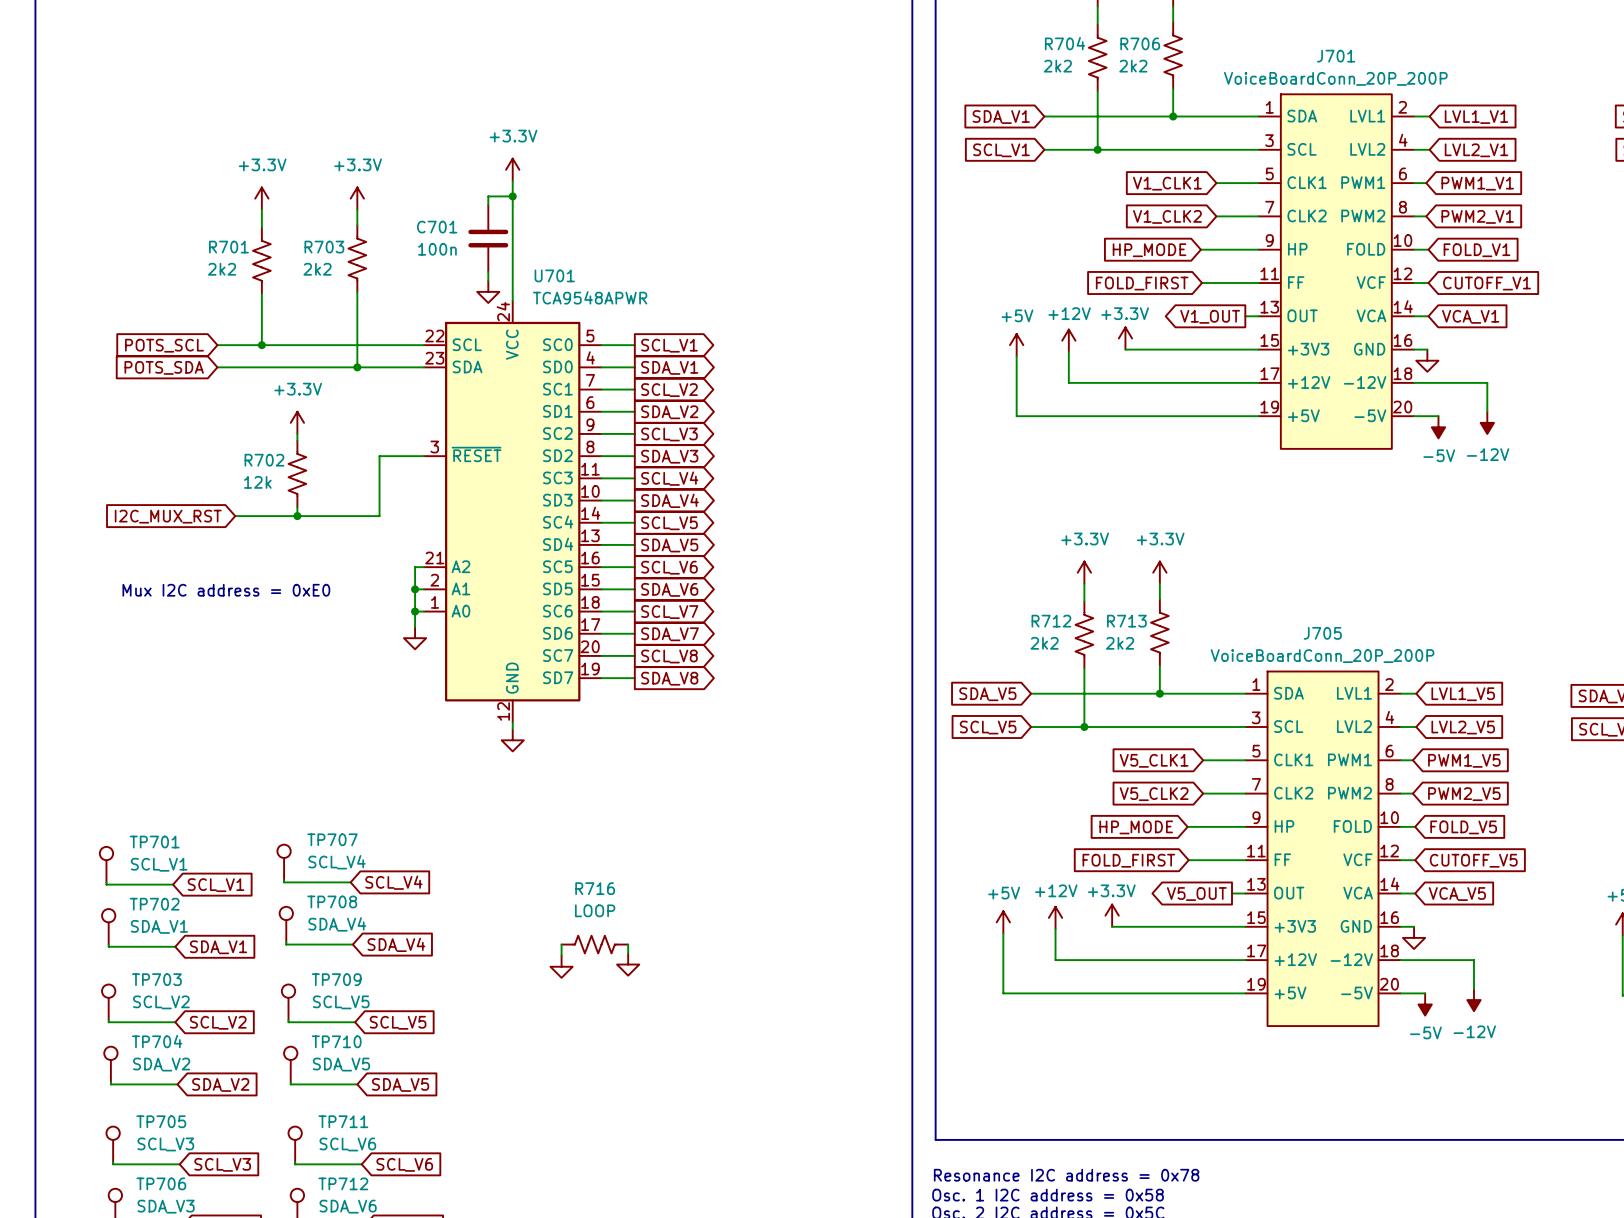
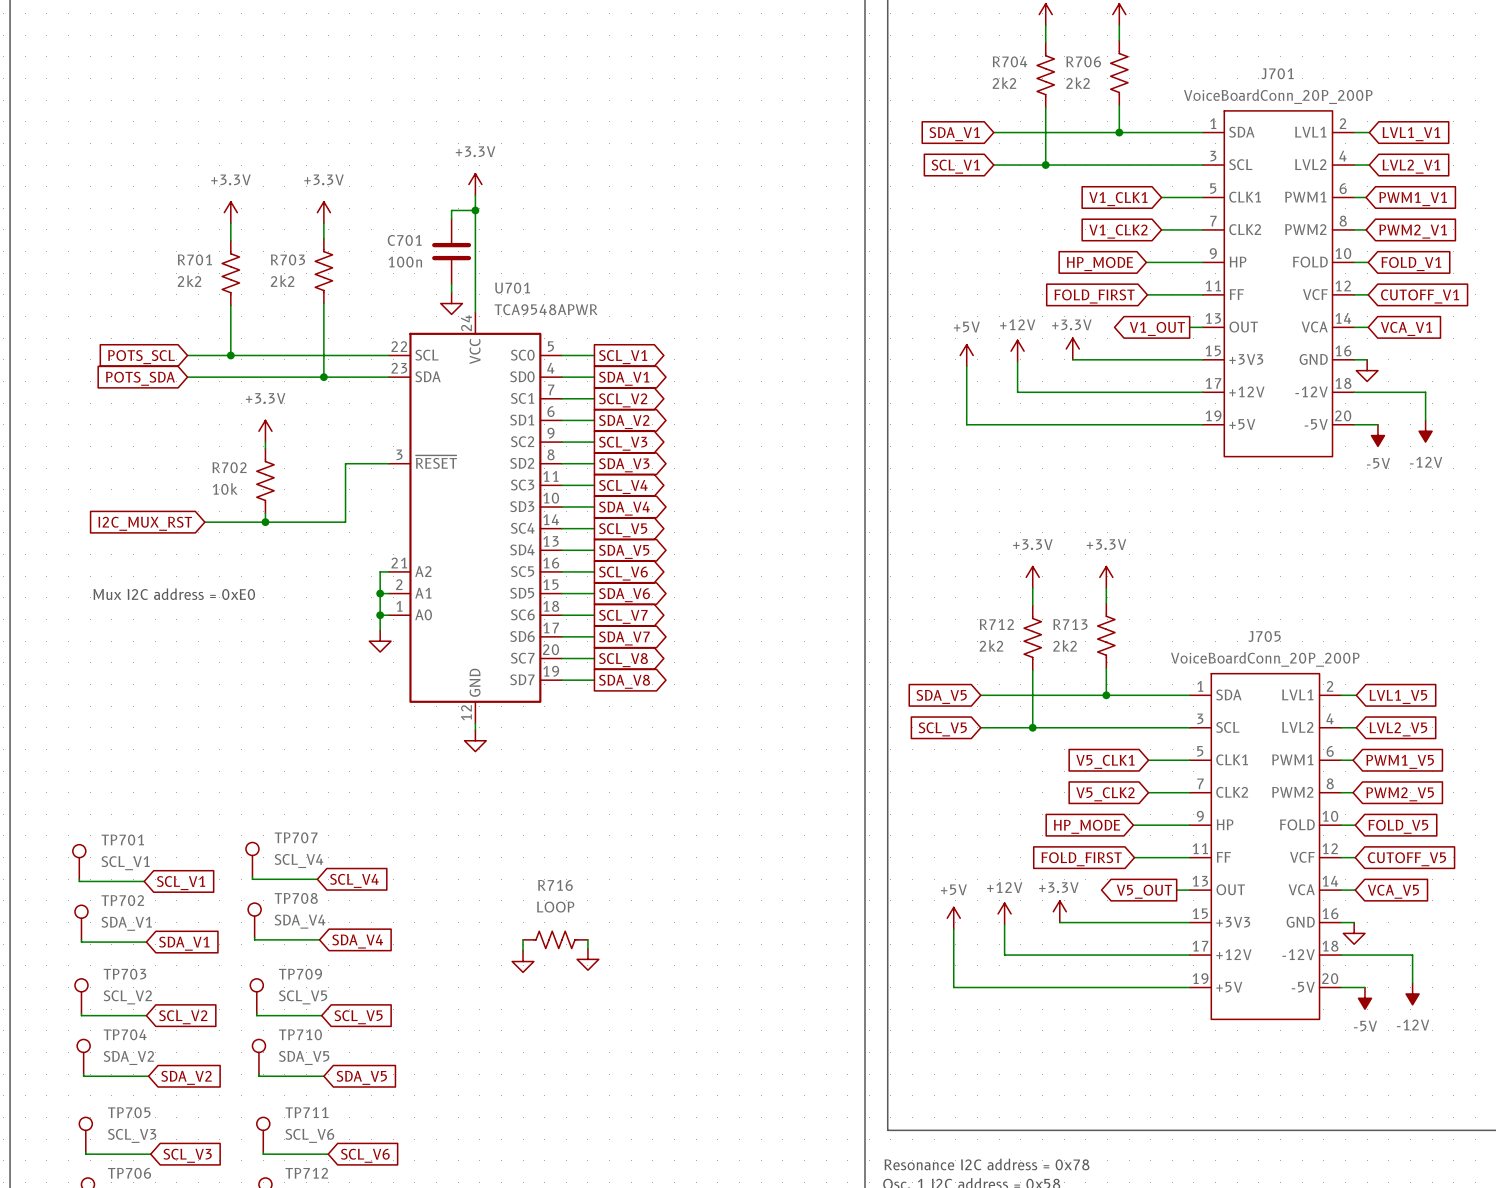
R702 value: 12k (257, 482) -> 10k (225, 488)

